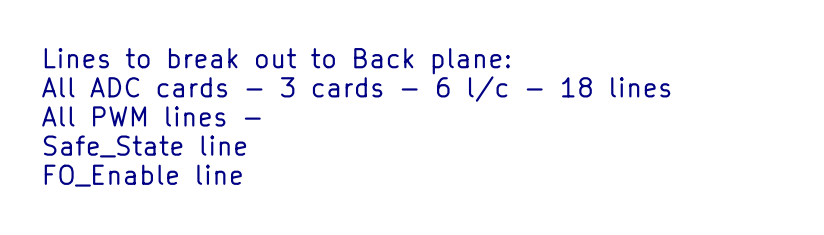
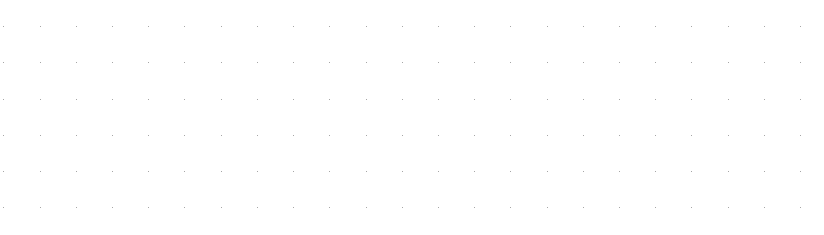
text: Lines to break out to Back plane: (277, 61) -> none
text: All ADC cards - 3 cards - 6 l/c - 18 lines (356, 89) -> none
text: All PWM lines - (151, 116) -> none
text: Safe_State line (144, 146) -> none
text: FO_Enable line (143, 175) -> none

